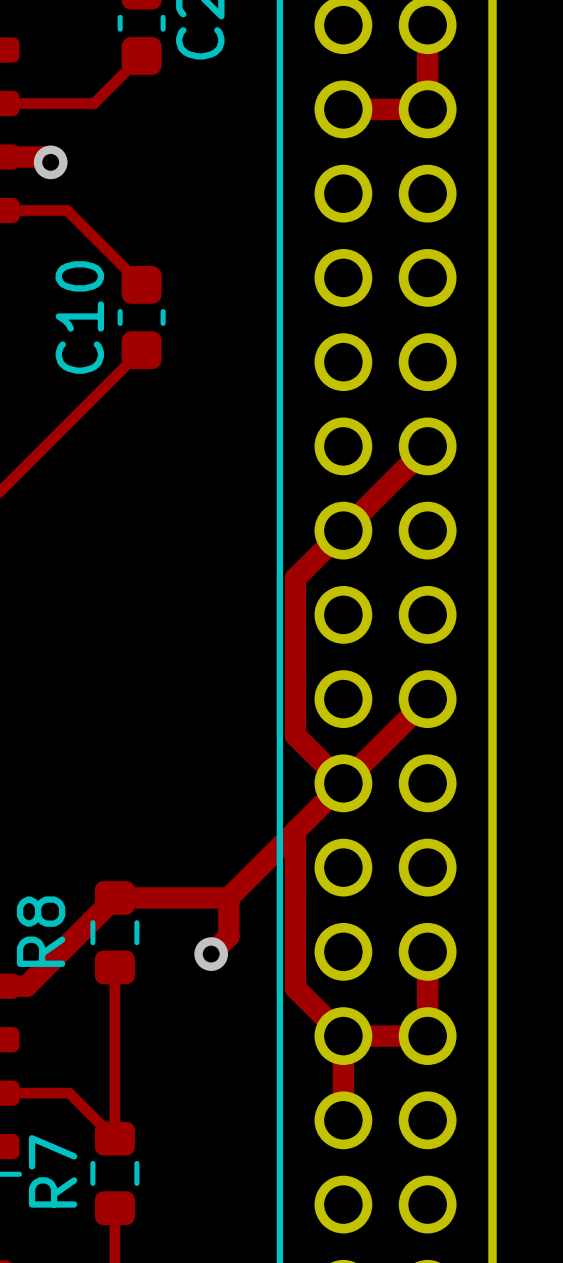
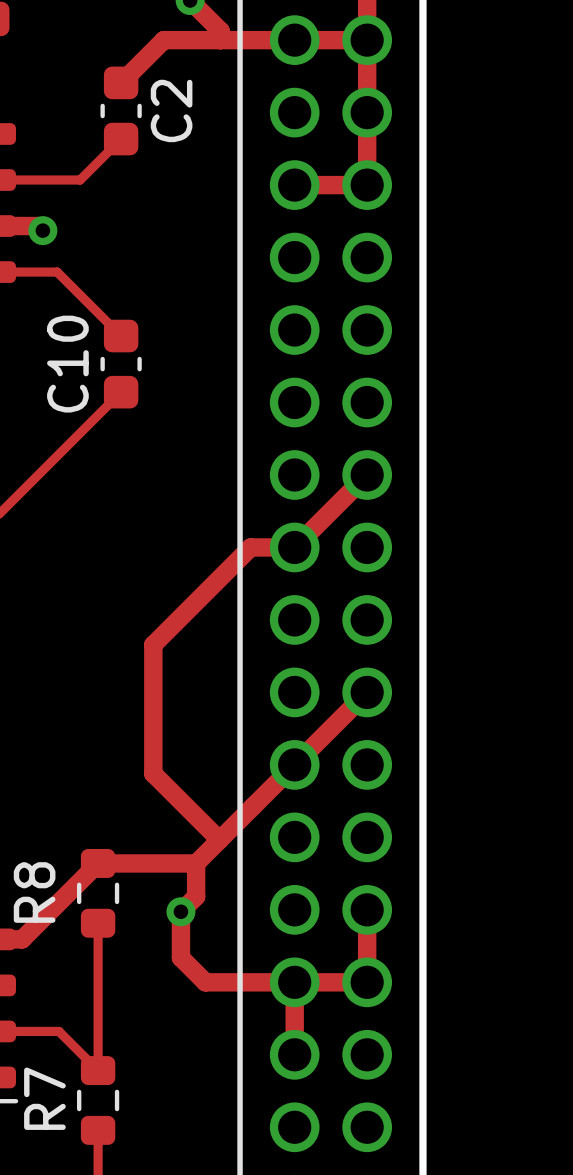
track: (343, 530) (295, 578) (295, 735) (343, 783) -> (294, 547) (250, 547) (153, 644) (153, 773) (219, 839)
track: (295, 831) (295, 988) (343, 1036) -> (180, 911) (180, 957) (205, 982) (294, 982)

